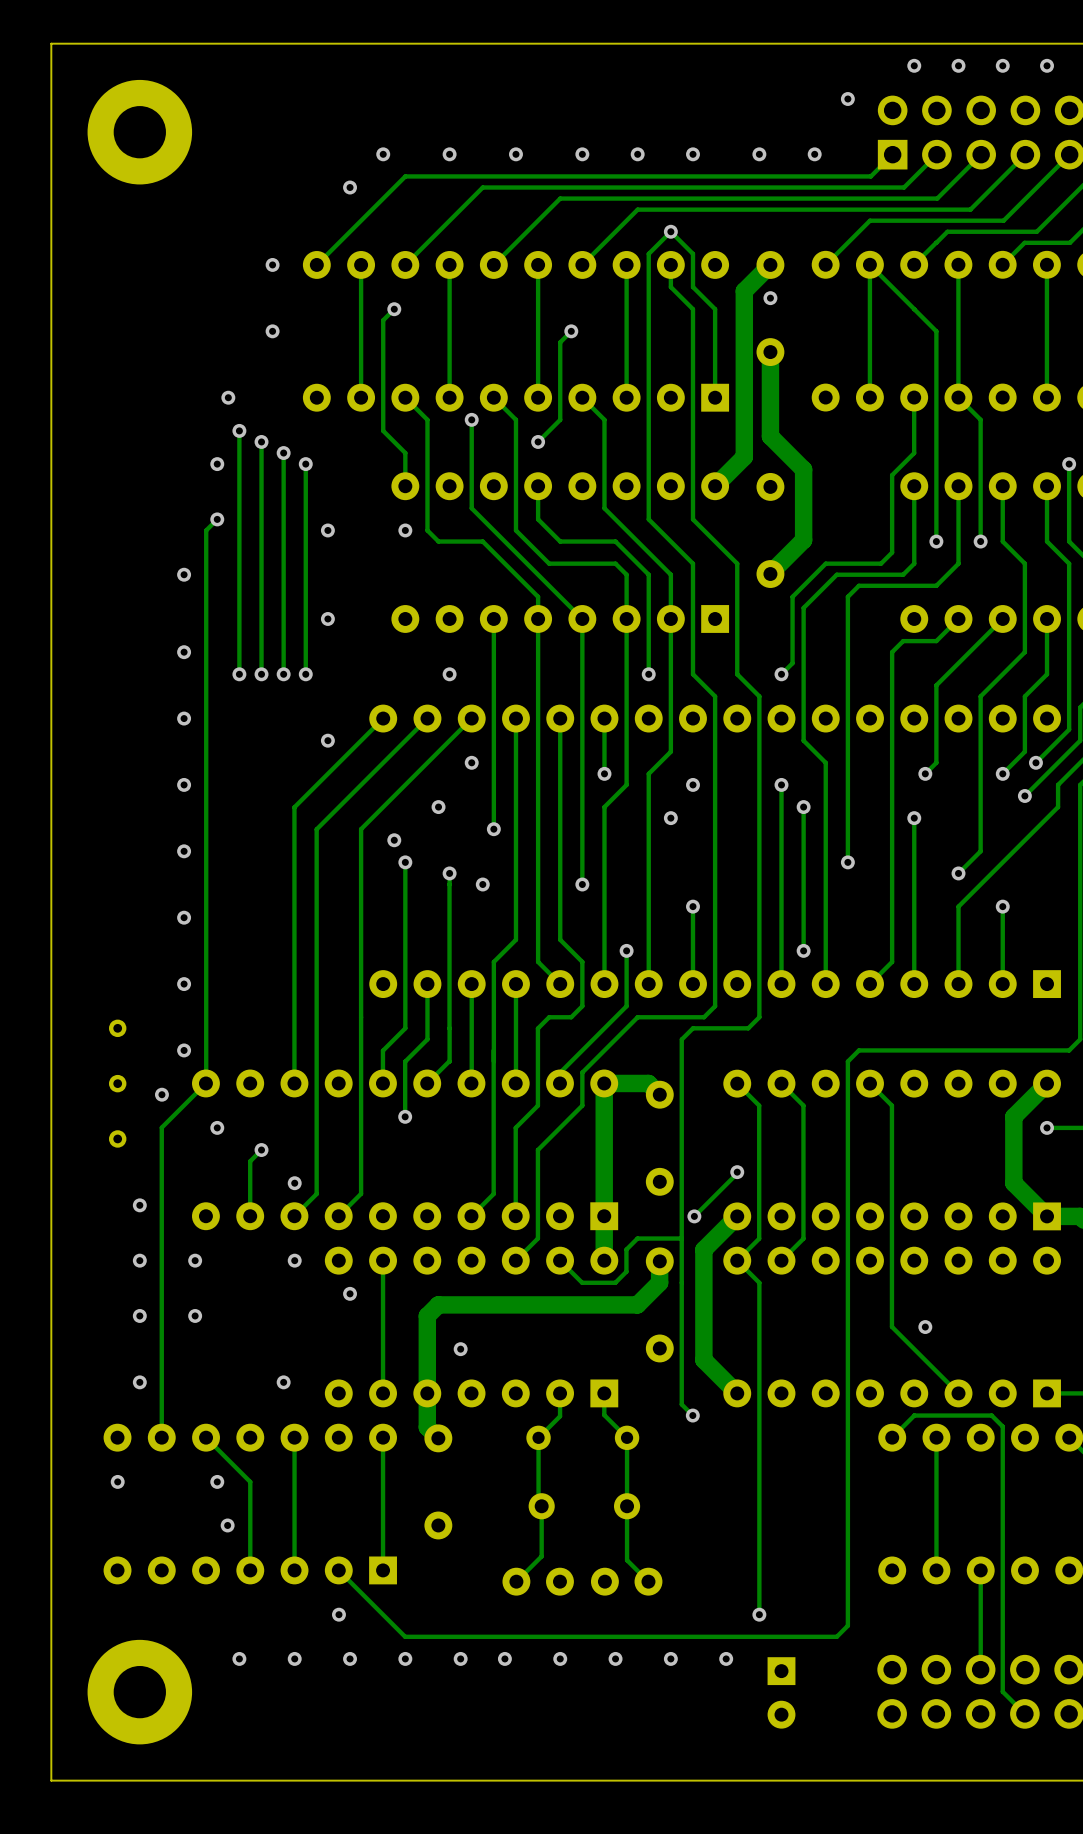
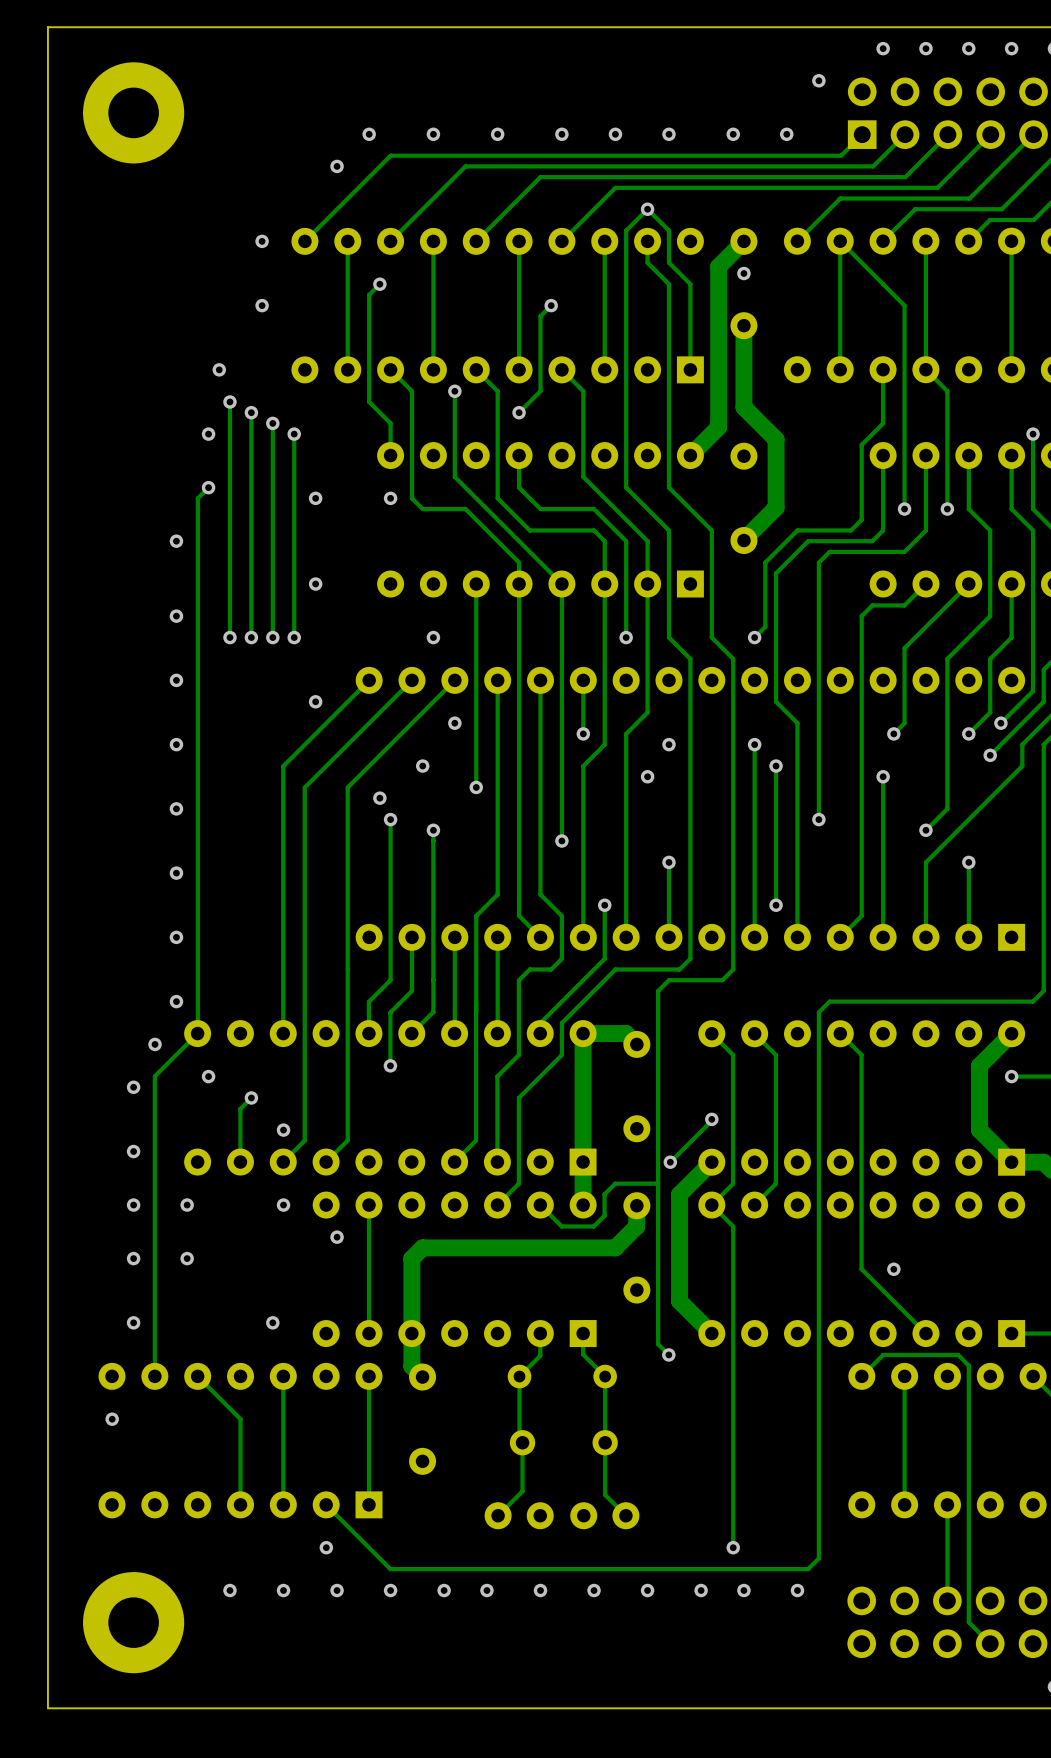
via: (482, 884) -> none
part: (117, 1028) -> none
part: (117, 1083) -> none
part: (117, 1138) -> none
via: none -> (133, 1087)
via: (460, 1349) -> none
via: (217, 1481) -> none
via: (227, 1525) -> none
via: none -> (743, 1590)
via: none -> (797, 1590)
part: (781, 1692) -> none

